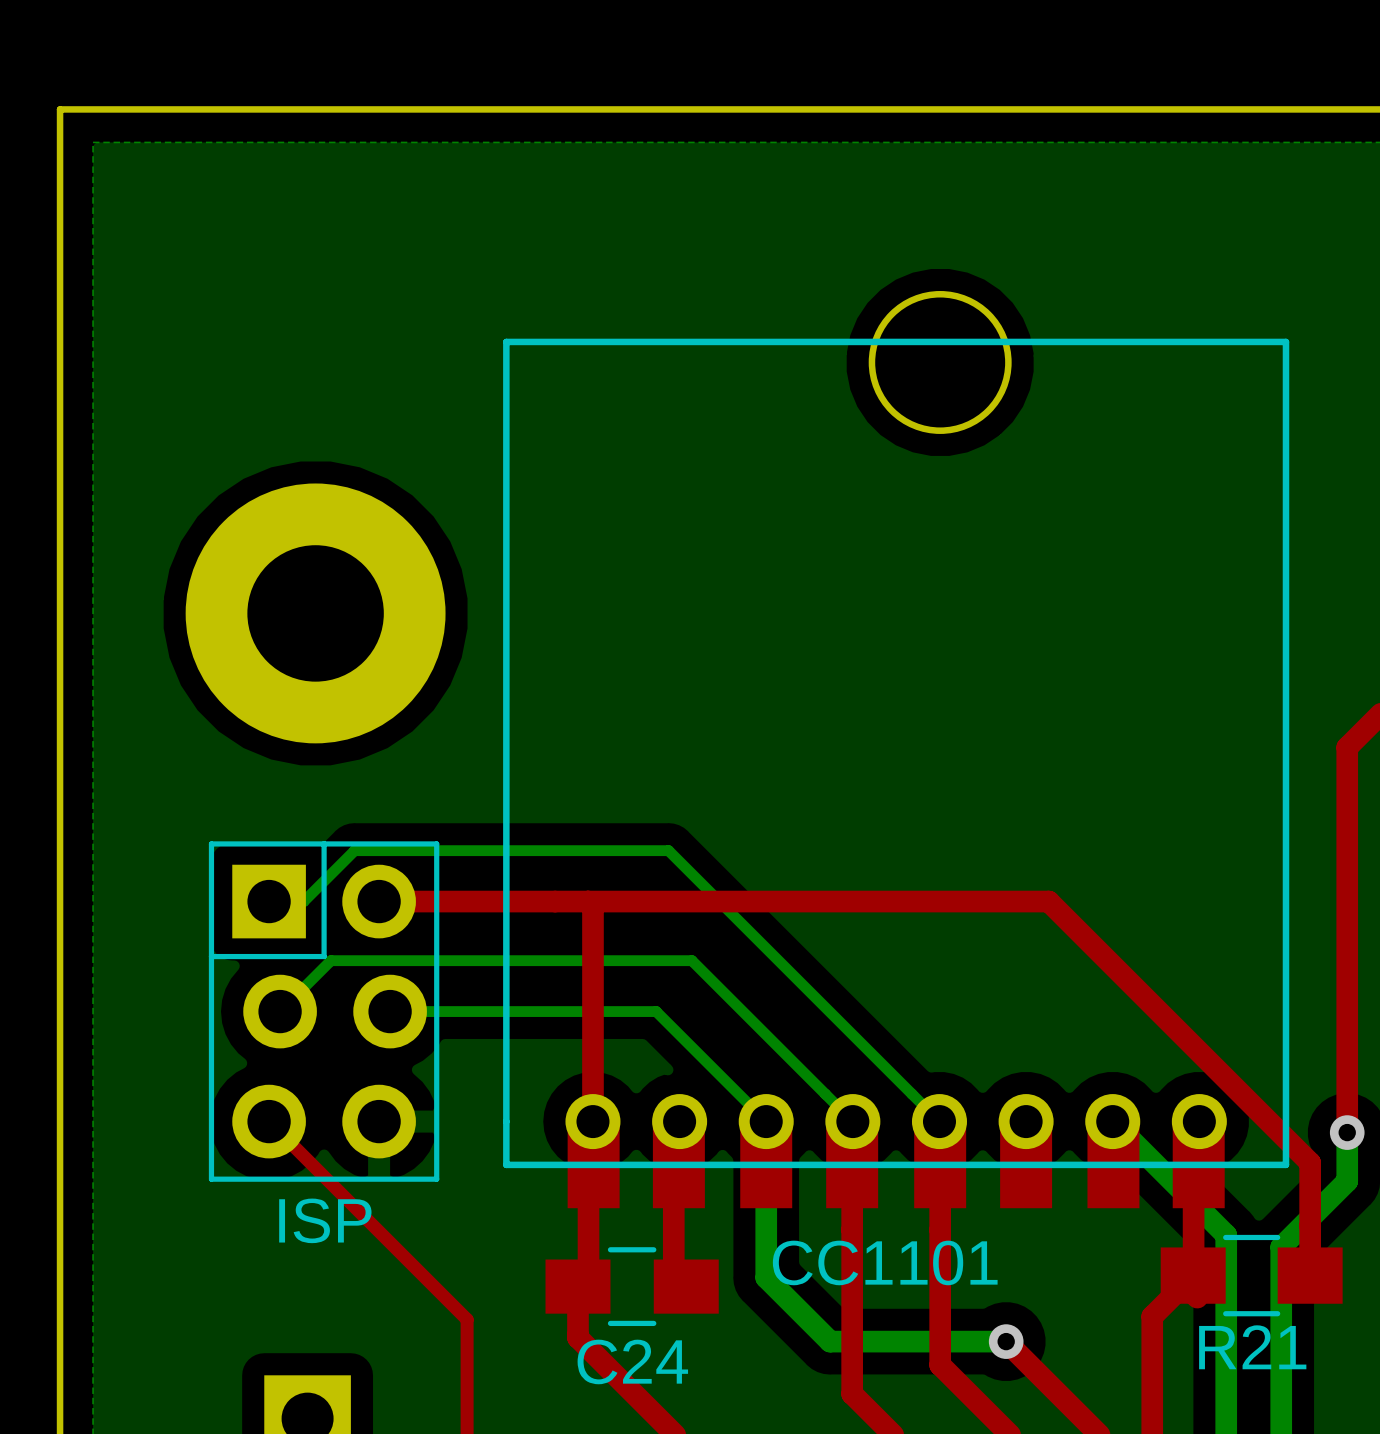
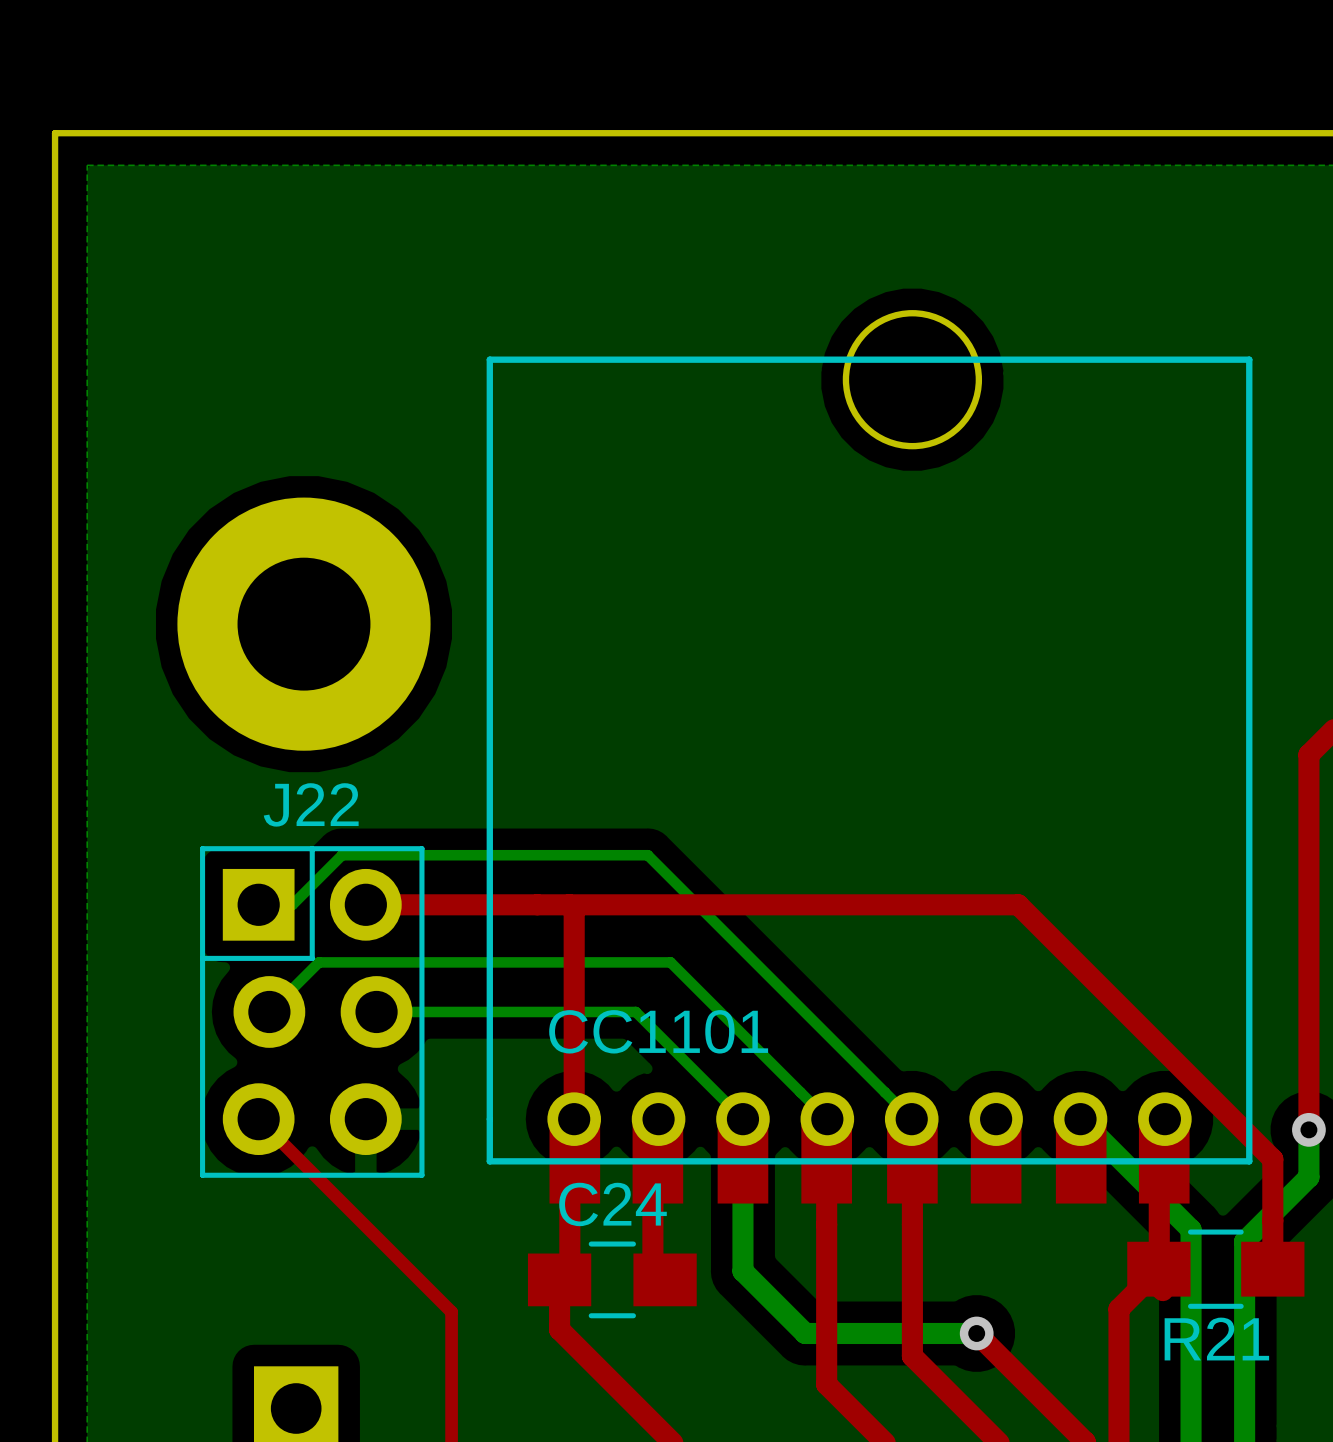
J22 name: none -> J22 (311, 804)
J22 value: ISP (325, 1220) -> none
part text position: CC1101 (885, 1262) -> CC1101 (658, 1031)
C24 name position: C24 (632, 1361) -> C24 (612, 1204)

